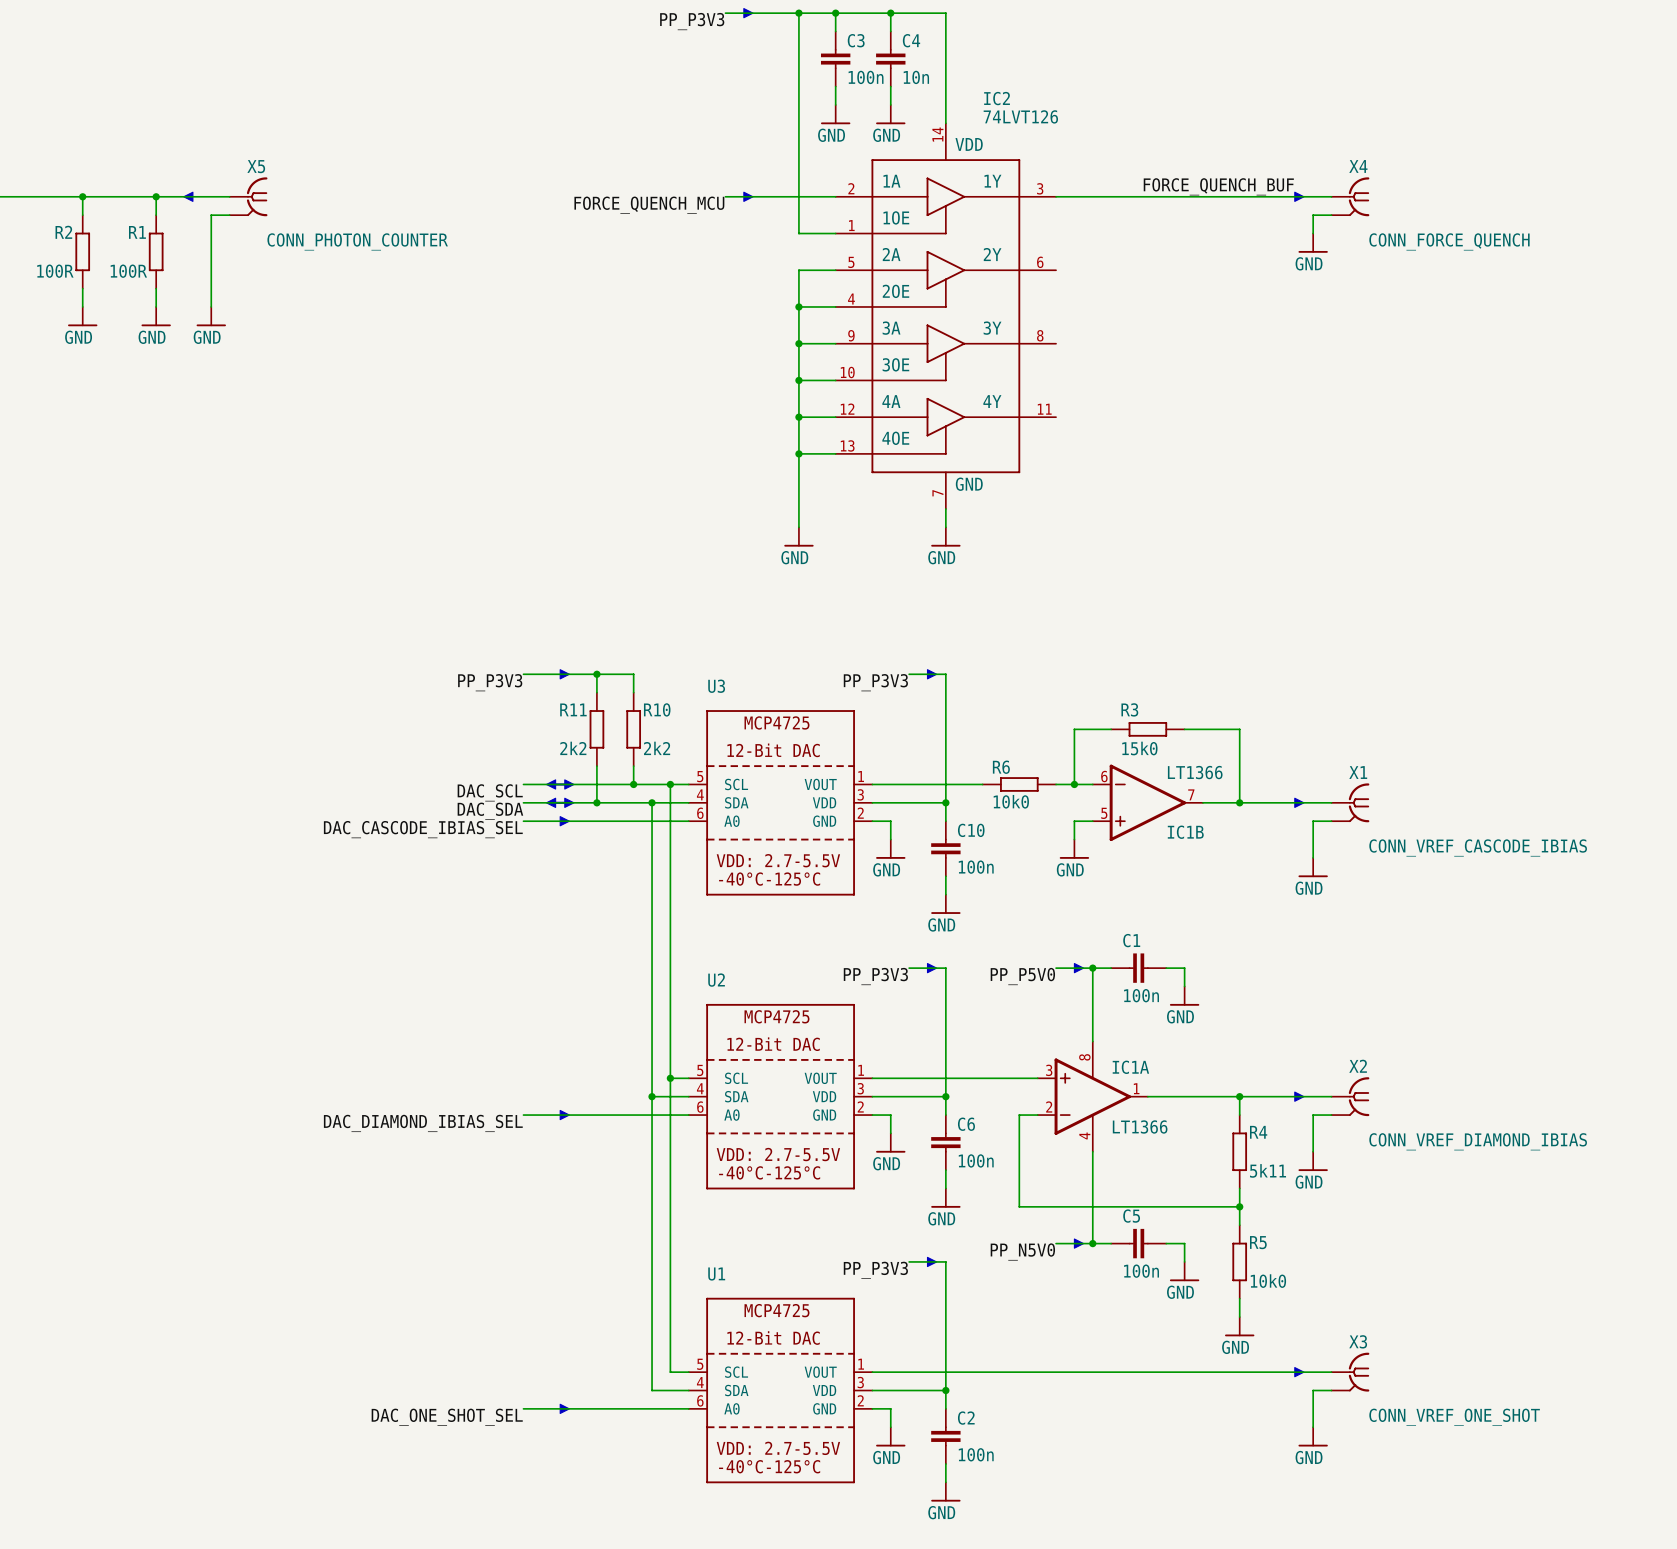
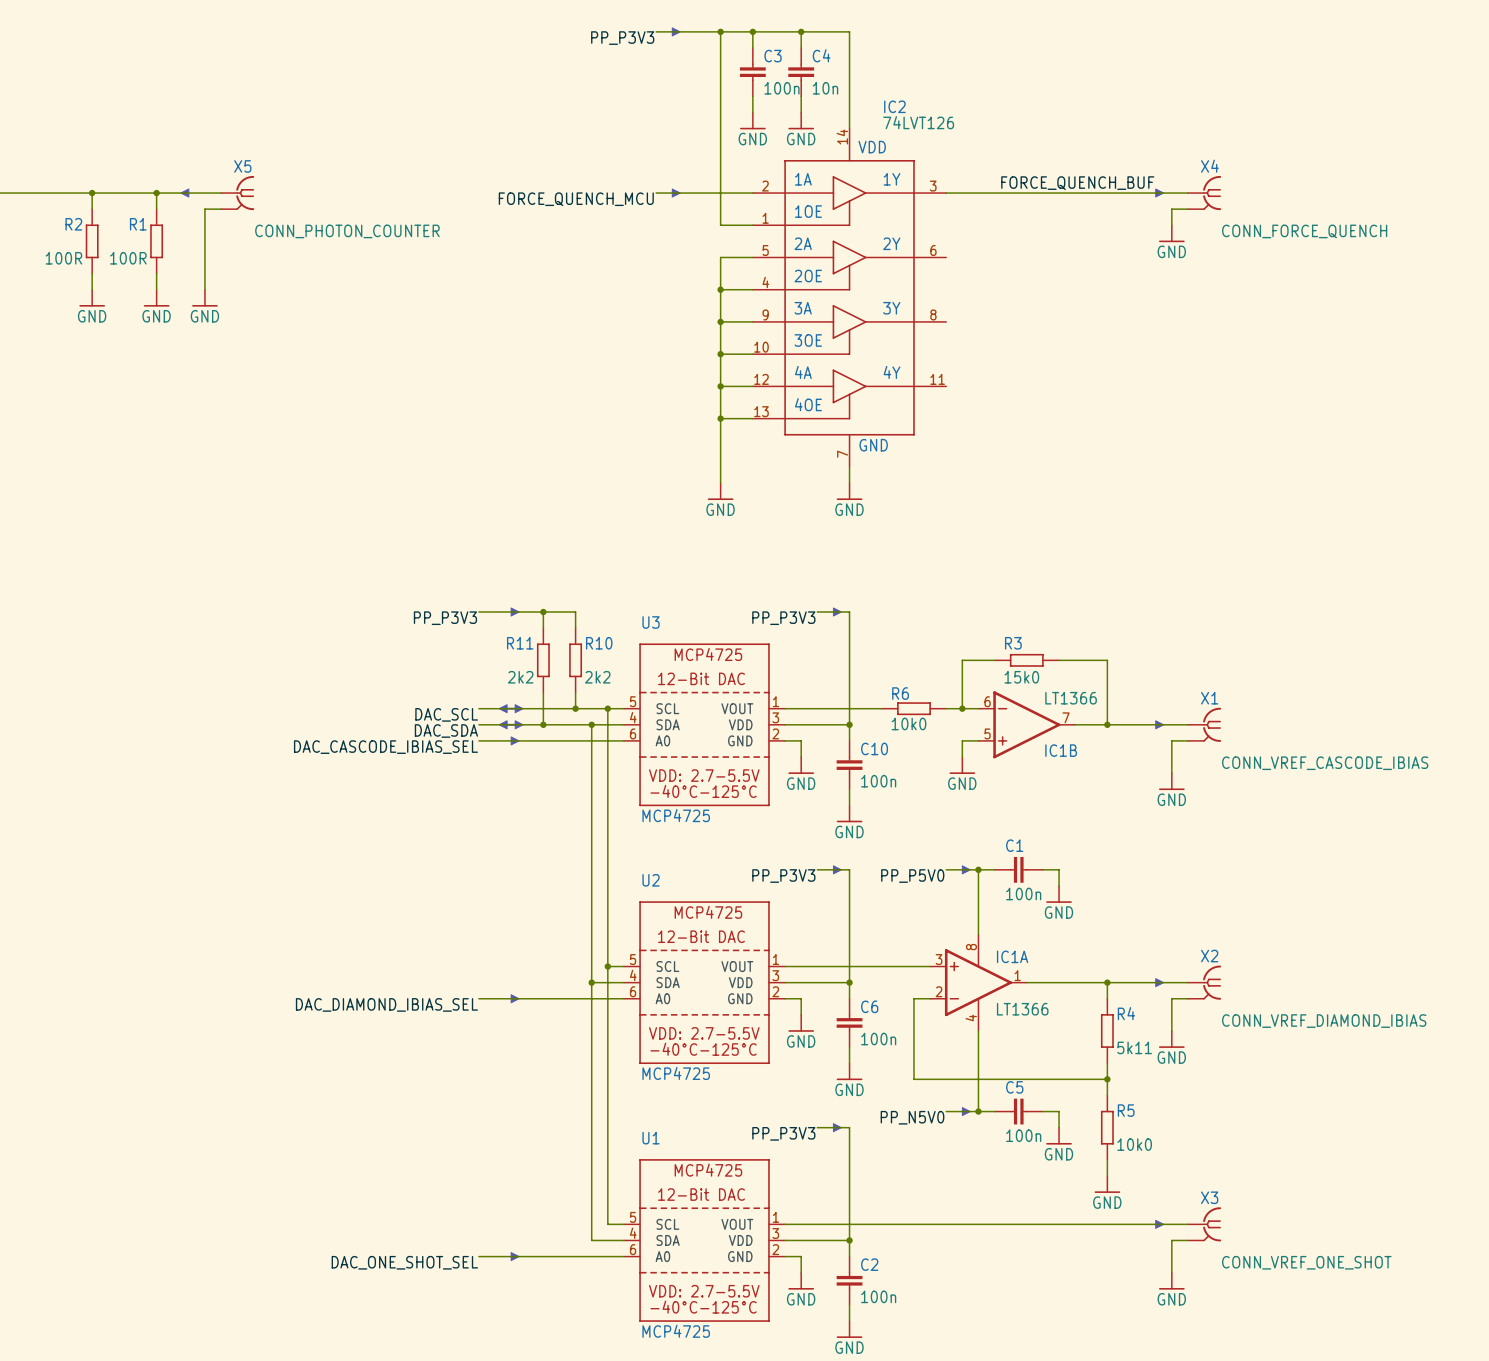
U3 value: none -> MCP4725 (676, 815)
U2 value: none -> MCP4725 (676, 1073)
U1 value: none -> MCP4725 (676, 1331)

